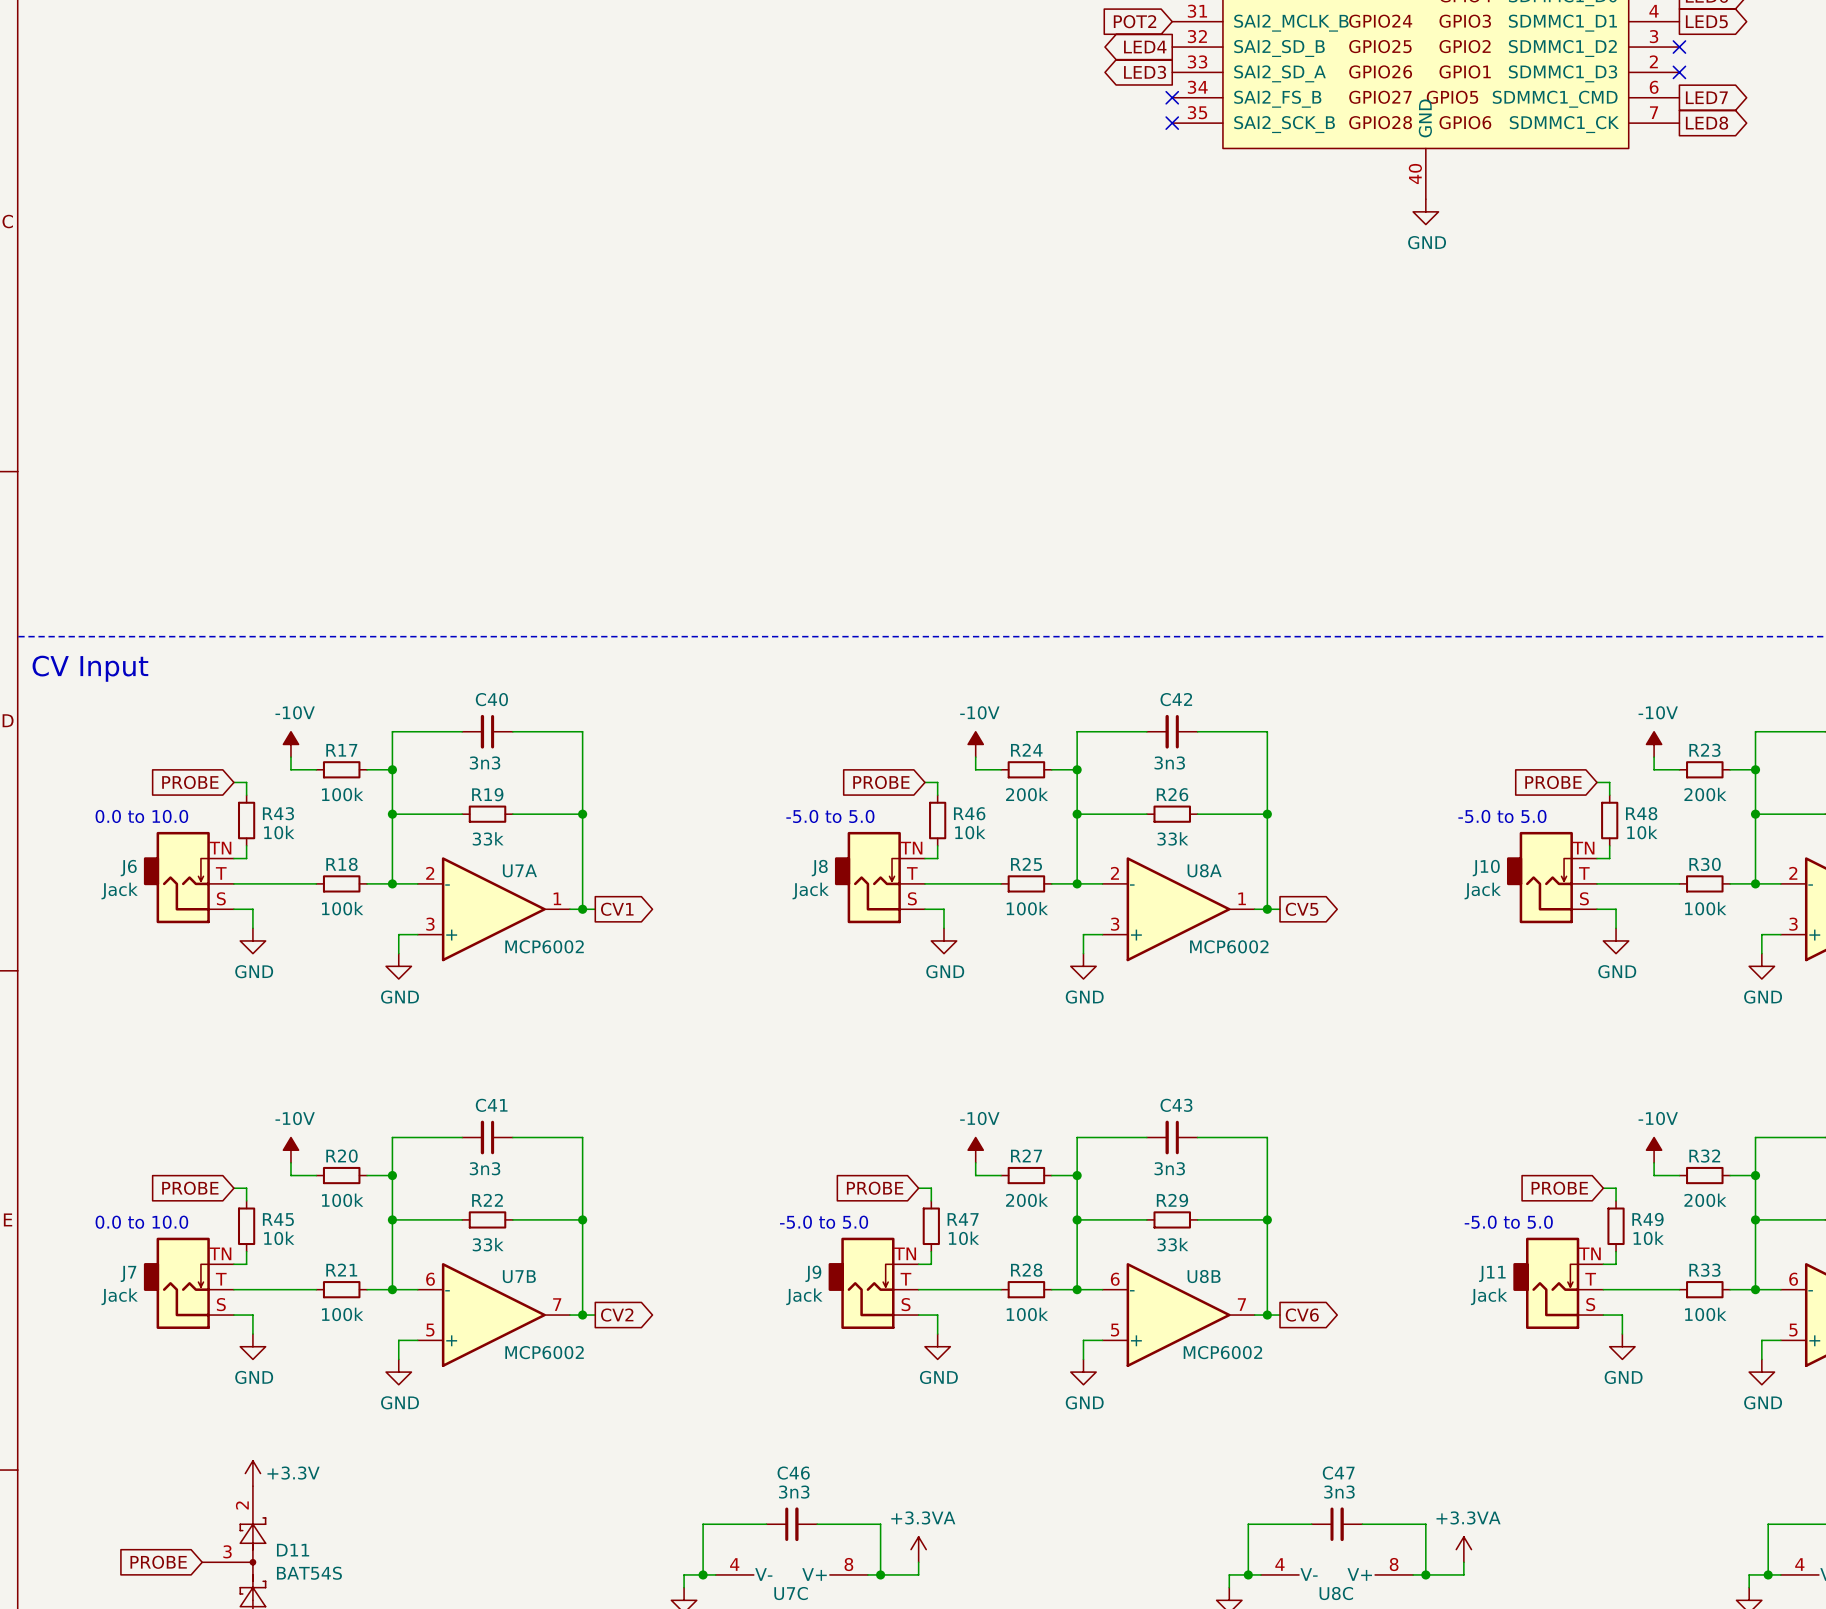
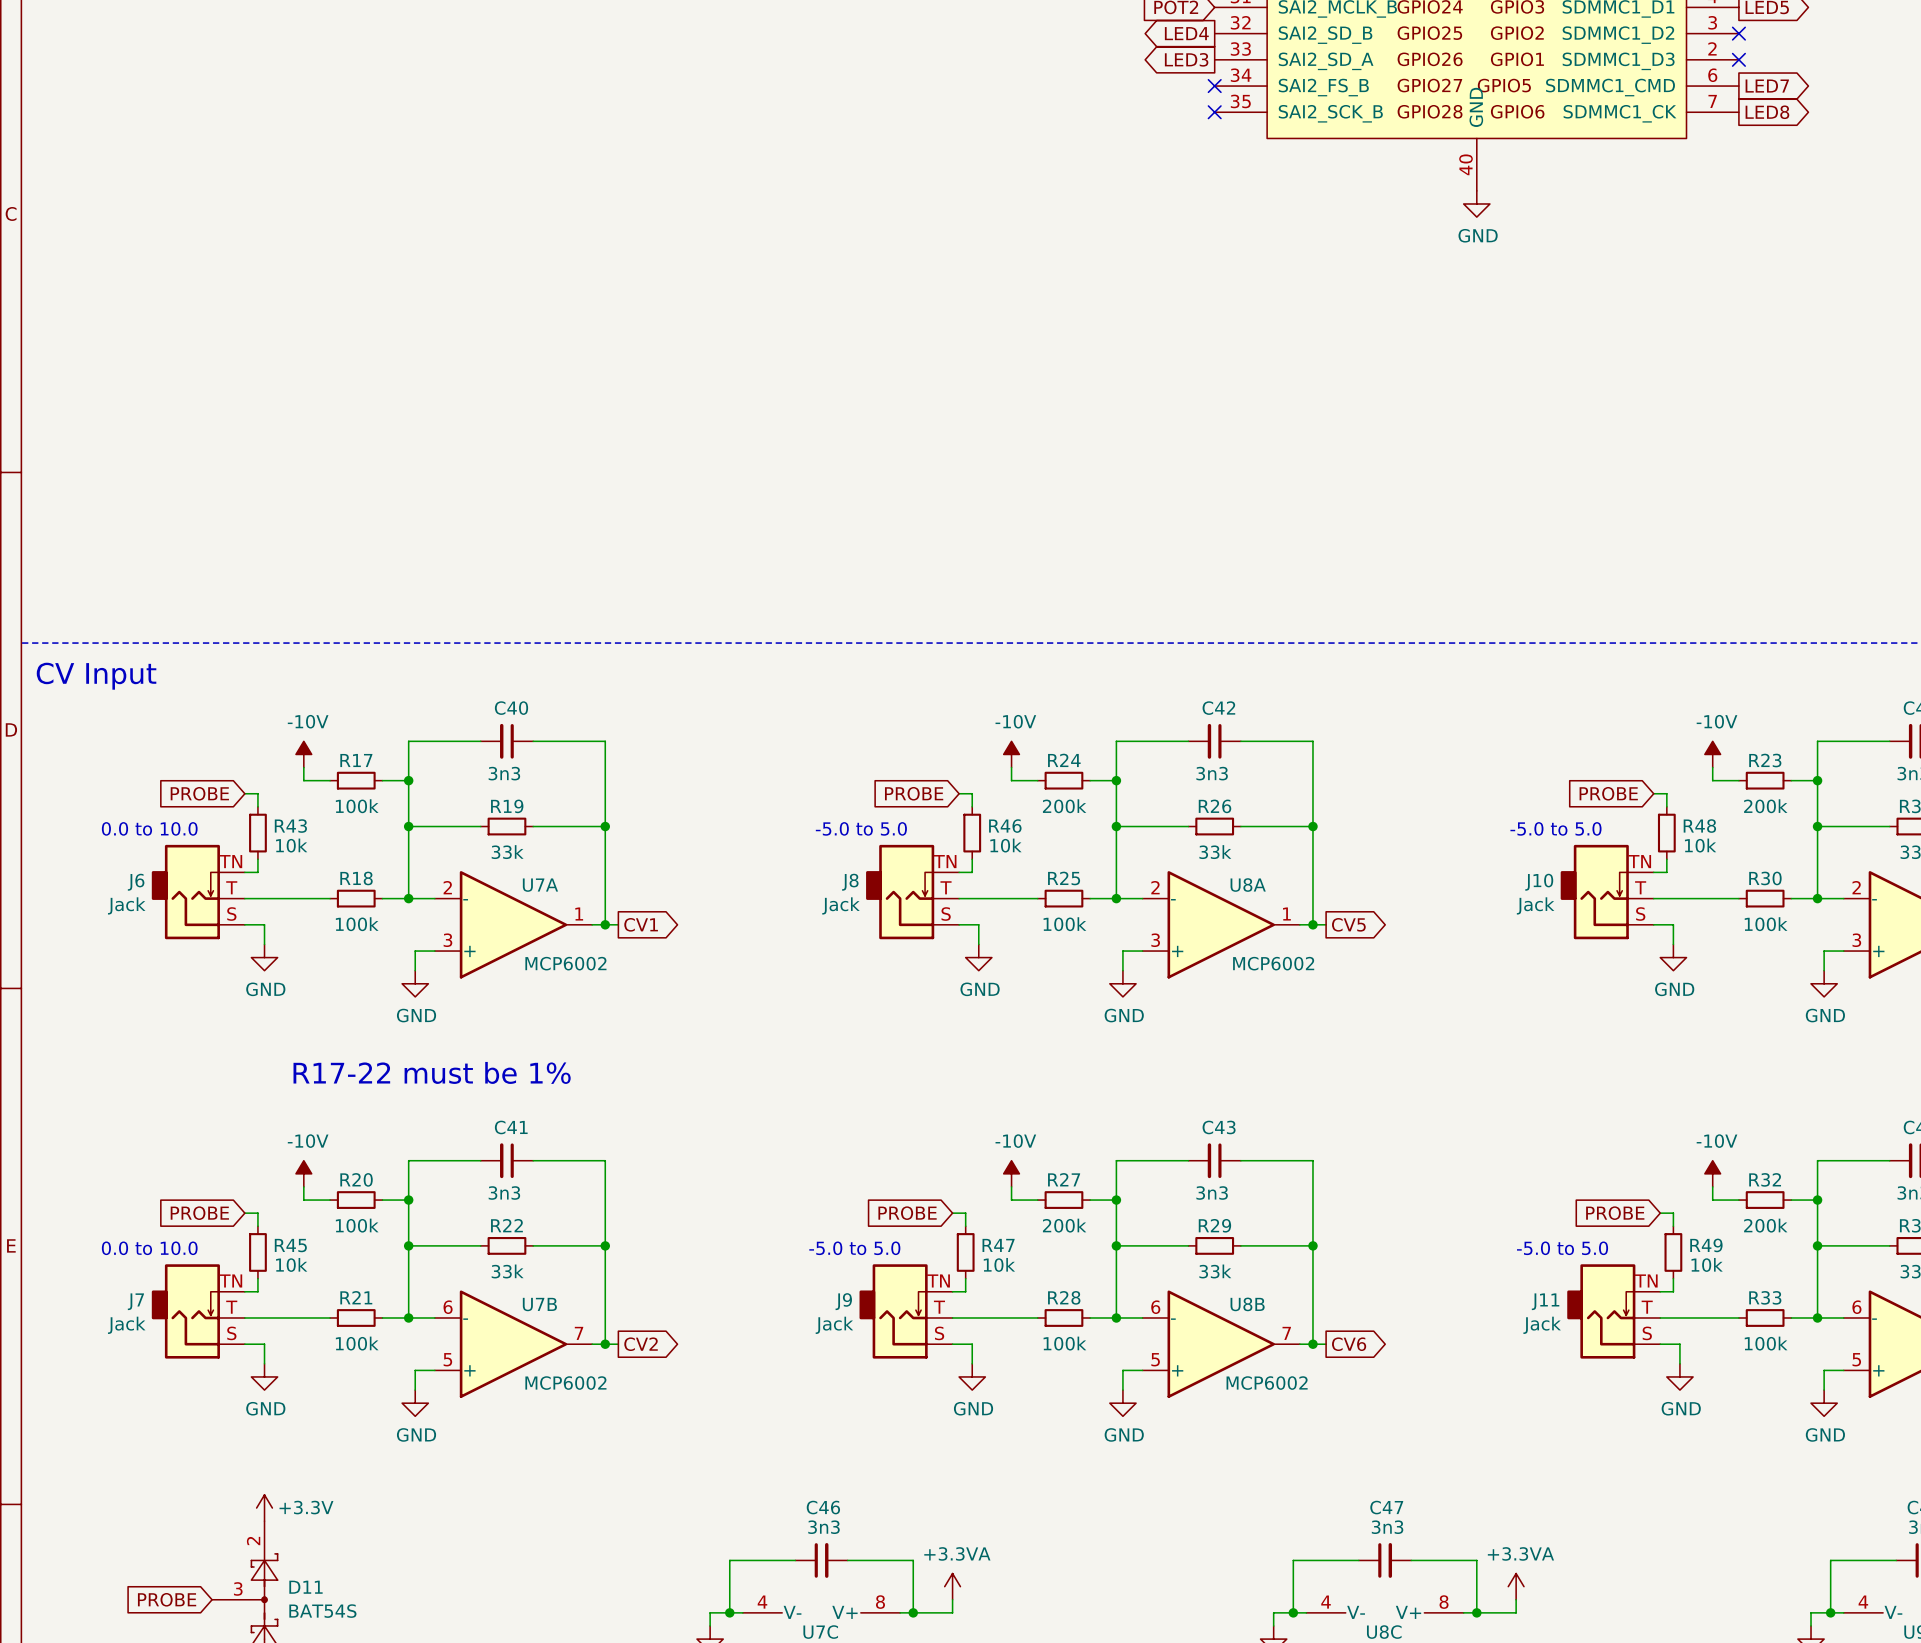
text: none -> R17-22 must be 1% (432, 1072)

